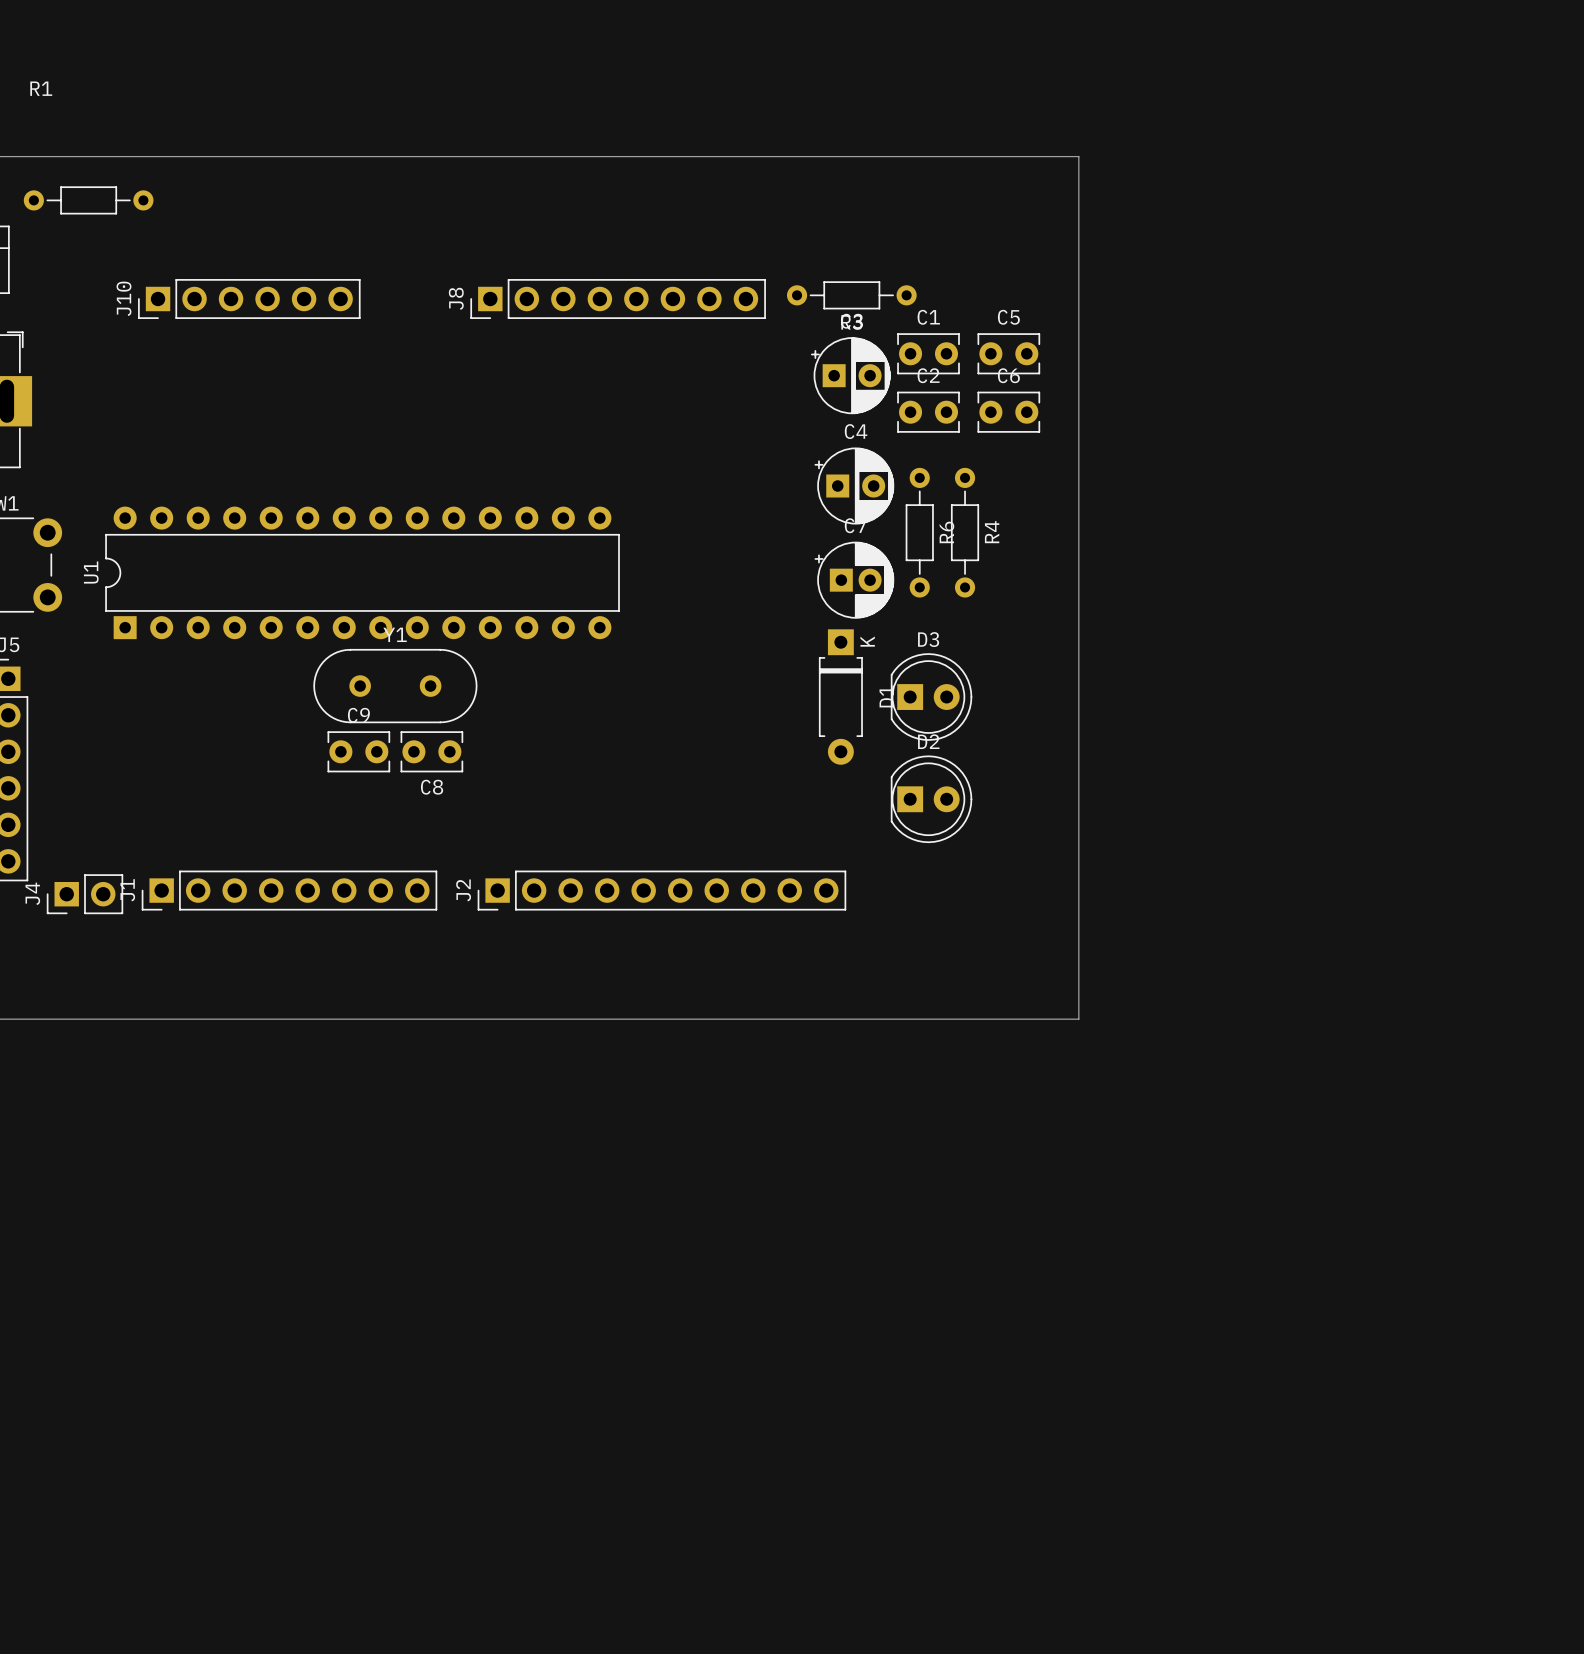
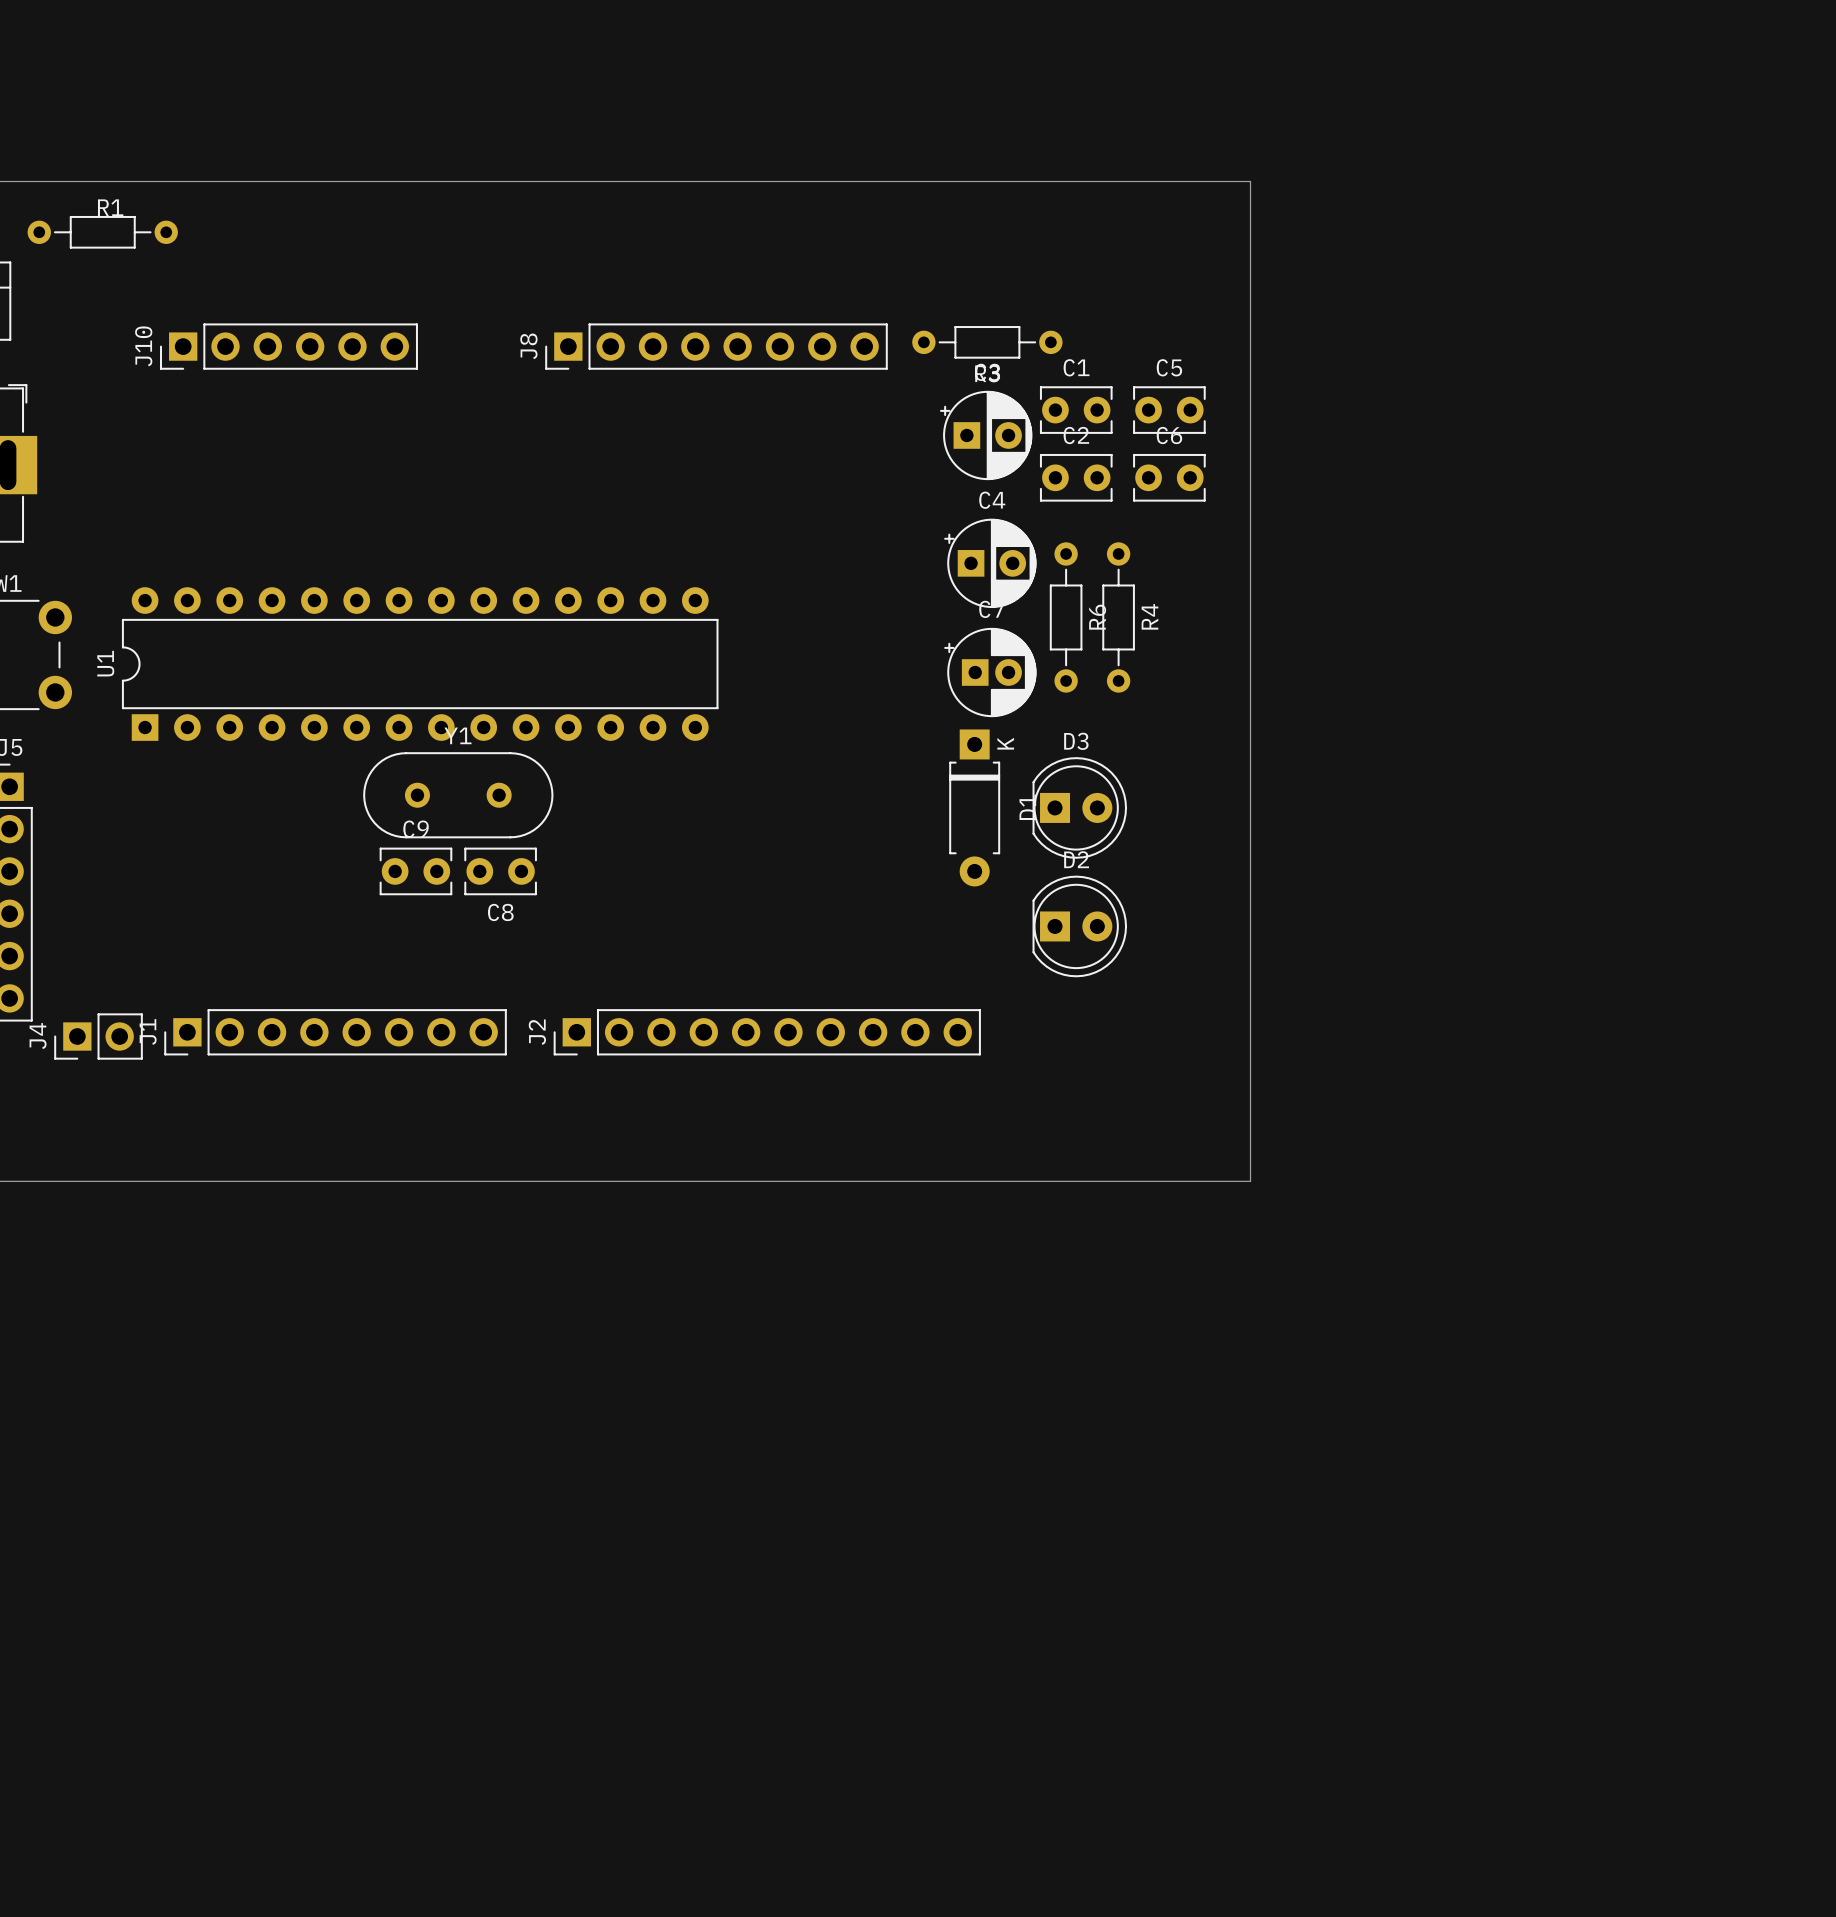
R1 name position: R1 (41, 88) -> R1 (110, 207)

